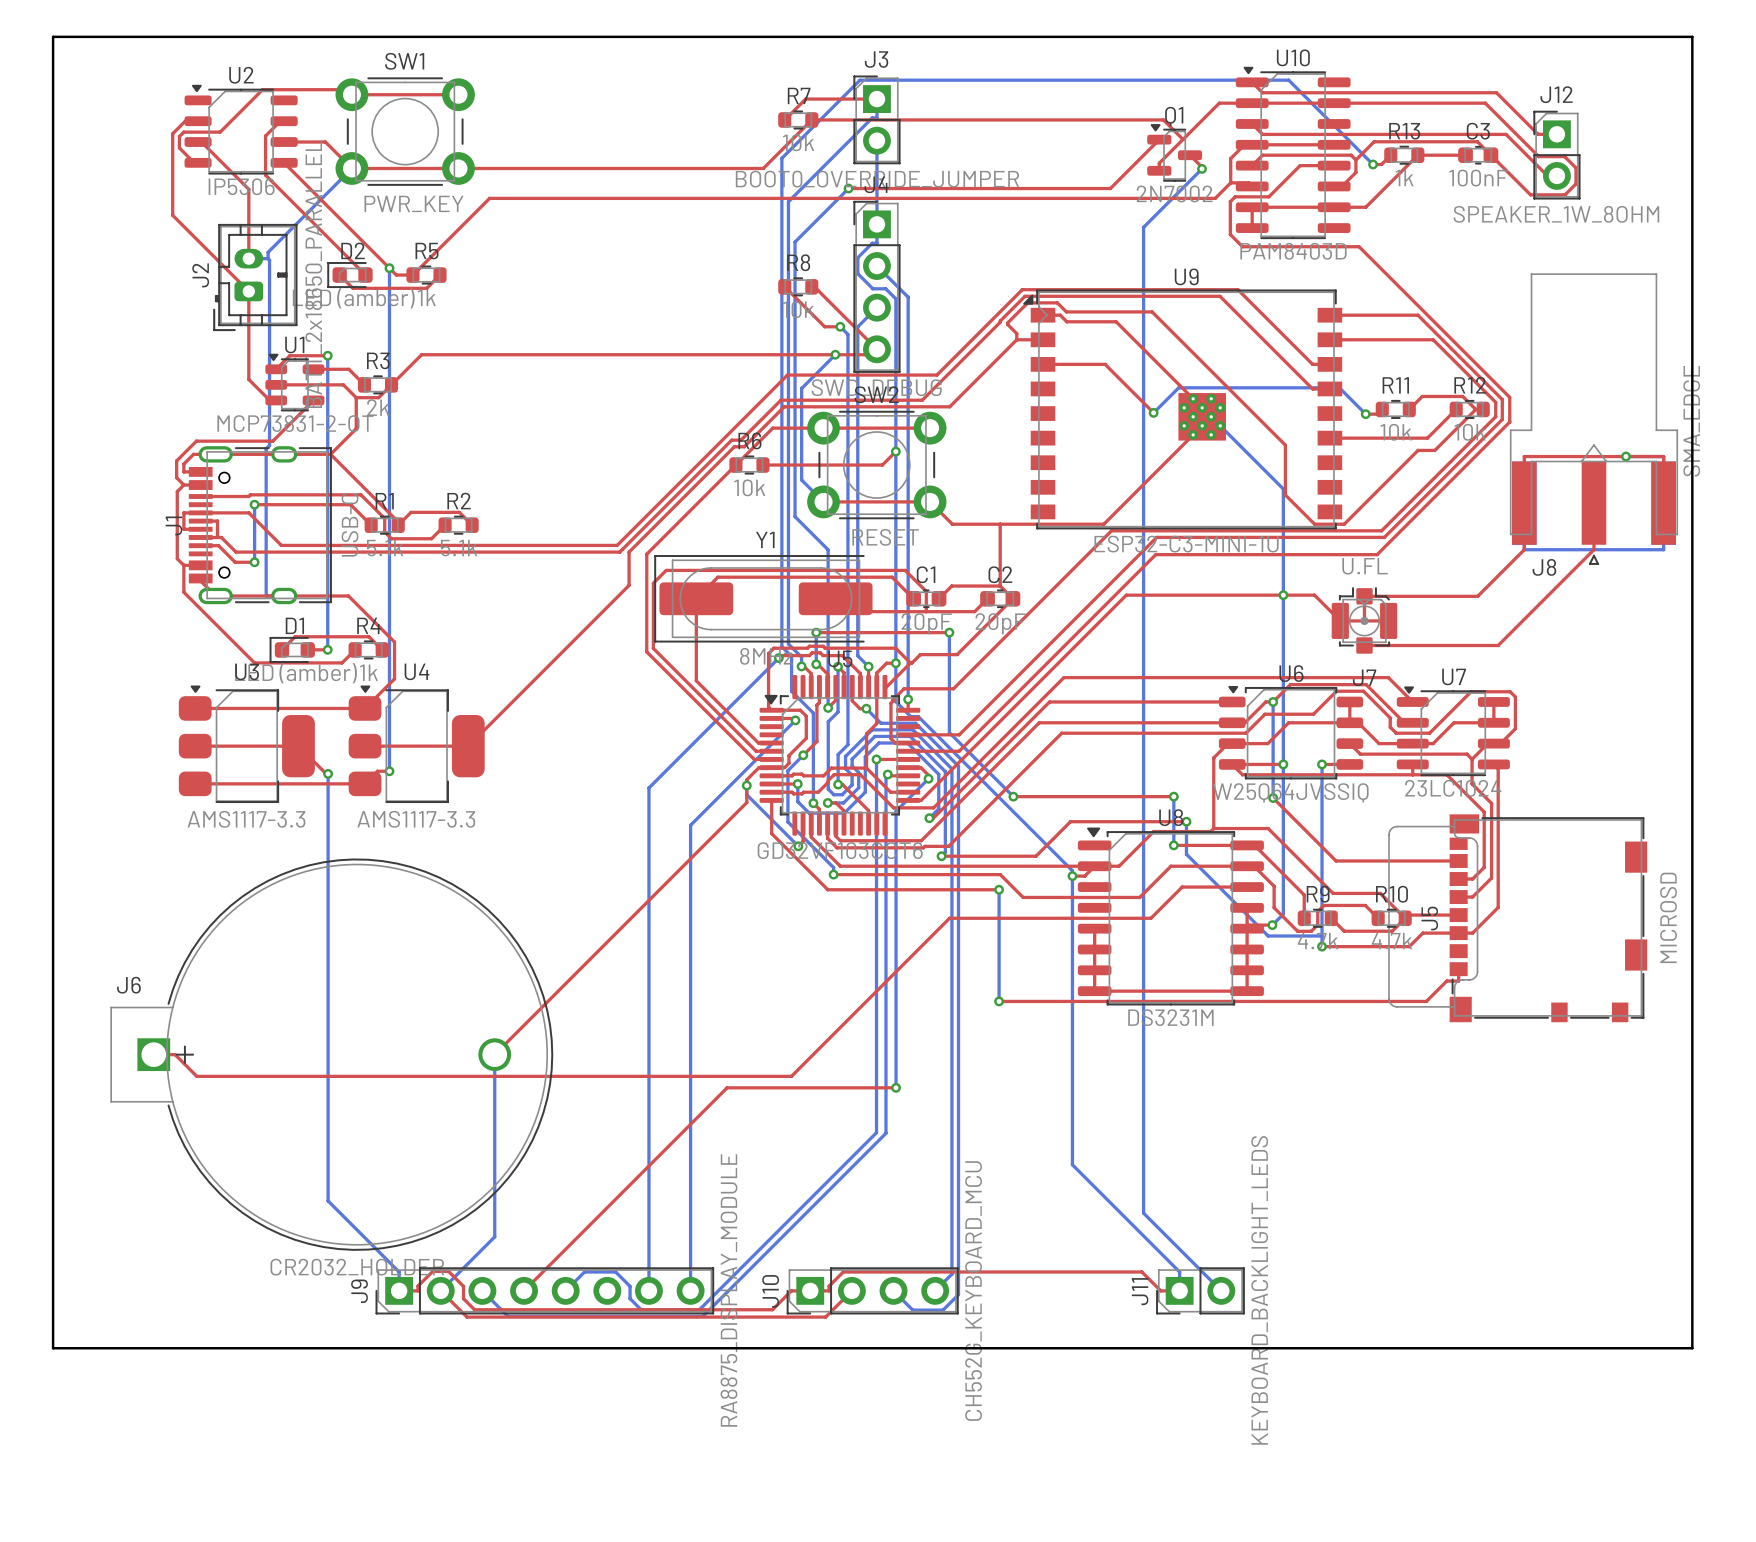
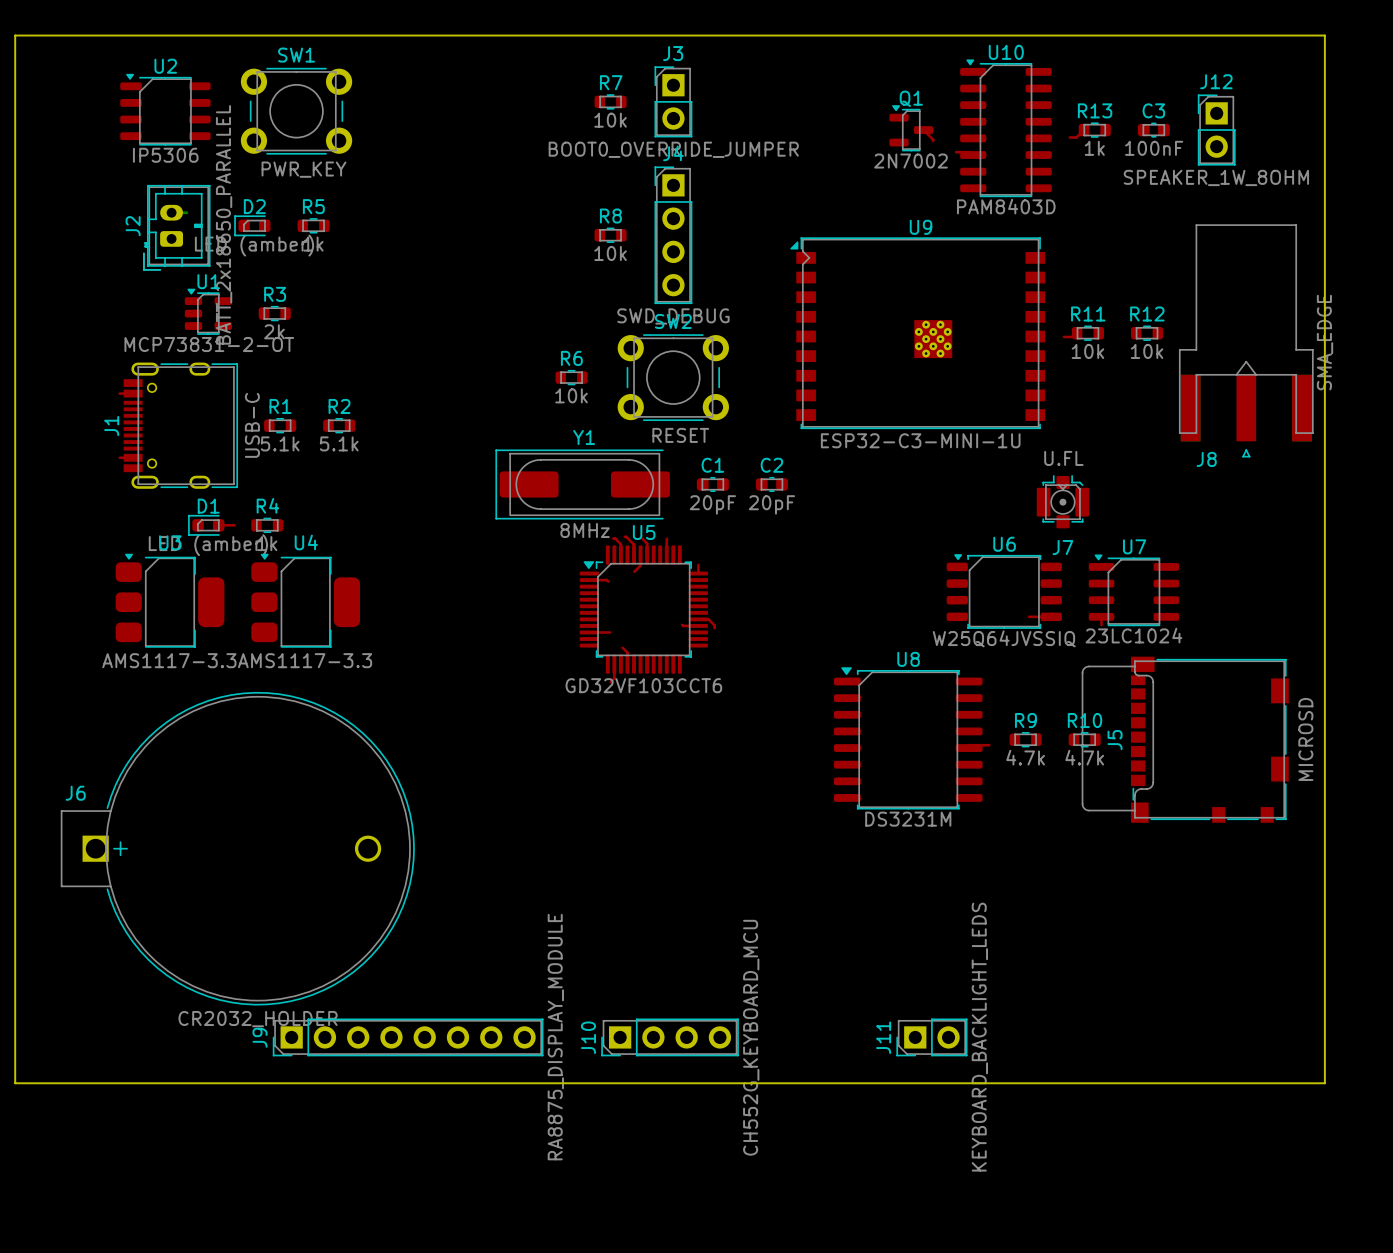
top track: (1252, 82) (1262, 92) (1496, 92) (1538, 134) (1556, 134) -> none
top track: (458, 94) (351, 94) (346, 89) (262, 89) (220, 132) (183, 132) (179, 136) (179, 148) (194, 162) (198, 162) -> none
top track: (876, 99) (805, 99) (784, 119) -> none
bottom track: (876, 99) (876, 117) (872, 117) (788, 201) (788, 644) (801, 657) (801, 666) -> none
top track: (198, 121) (185, 121) (172, 133) (172, 215) (248, 291) (248, 379) (269, 400) (276, 400) -> none
top track: (284, 121) (280, 121) (265, 136) (265, 175) (365, 275) -> none
top track: (1252, 123) (1262, 134) (1506, 134) (1547, 175) (1556, 175) -> none
top track: (1159, 139) (1110, 188) (848, 188) -> none
top track: (1183, 139) (1163, 119) (811, 119) (763, 168) (351, 168) (325, 142) (284, 142) -> none
bottom track: (876, 140) (876, 243) (872, 243) (857, 257) (857, 273) (872, 288) (885, 288) (895, 298) (895, 701) (910, 716) (918, 716) (1072, 870) (1072, 1164) (1179, 1271) (1179, 1290) -> none
top track: (198, 142) (201, 142) (248, 189) (248, 258) -> none
top track: (1334, 144) (1244, 144) (1230, 158) (1230, 182) (1215, 198) (489, 198) (412, 275) (396, 275) (284, 162) -> none
top track: (1465, 155) (1417, 155) (1365, 207) (1252, 207) (1252, 228) -> none
top track: (1355, 159) (1355, 172) (1341, 186) (1334, 186) -> none
top track: (1355, 159) (1374, 141) (1477, 141) (1530, 194) (1565, 194) (1576, 183) (1576, 167) (1564, 156) (1538, 156) (1485, 103) (1219, 103) (1159, 163) (1159, 170) -> none
top track: (1355, 159) (1351, 155) (1262, 155) (1252, 165) -> none
bottom track: (1373, 164) (1288, 80) (859, 80) (781, 158) (781, 646) (791, 656) (791, 691) (813, 713) (813, 803) -> none
via: (1373, 164) -> none
top track: (1334, 165) (1300, 165) (1268, 196) (1235, 196) (1230, 201) (1230, 234) (1242, 246) (1359, 246) (1509, 397) (1509, 422) (1377, 554) (1155, 554) (959, 751) (908, 751) -> none
bottom track: (351, 168) (268, 252) (269, 445) (266, 448) (266, 596) (284, 596) -> none
bottom track: (1202, 168) (1143, 227) (1143, 1213) (1221, 1290) -> none
via: (1202, 168) -> none
bottom track: (848, 188) (795, 242) (795, 516) (828, 549) (828, 707) -> none
via: (848, 188) -> none
bottom track: (876, 266) (908, 297) (908, 699) -> none
bottom track: (389, 268) (389, 771) -> none
via: (389, 268) -> none
top track: (339, 275) (352, 288) (426, 288) (440, 275) -> none
top track: (784, 286) (824, 326) (840, 326) -> none
top track: (811, 286) (814, 286) (876, 349) (871, 354) (421, 354) (378, 397) (356, 397) -> none
bottom track: (876, 307) (857, 326) (857, 655) (868, 666) -> none
top track: (1043, 315) (1060, 315) (1066, 321) (1116, 321) (1193, 398) (1211, 398) -> none
top track: (1329, 315) (1417, 315) (1502, 399) (1502, 419) (1384, 537) (1156, 537) (959, 734) (908, 734) -> none
bottom track: (840, 326) (847, 334) (847, 744) (838, 754) (838, 784) -> none
via: (840, 326) -> none
top track: (1016, 339) (949, 406) (784, 406) (744, 446) (734, 446) (629, 552) (629, 585) (468, 746) (365, 746) -> none
top track: (1016, 339) (1043, 339) -> none
top track: (1016, 339) (1016, 333) (1007, 323) (1027, 302) (1057, 302) (1066, 311) (1152, 311) (1285, 445) (1285, 495) (1314, 524) (1344, 524) (1418, 450) (1434, 450) (1475, 409) -> none
top track: (1329, 339) (1433, 339) (1495, 402) (1495, 416) (1381, 530) (1111, 530) (953, 688) (904, 688) (892, 699) (890, 703) (890, 738) (895, 743) (908, 743) -> none
bottom track: (835, 354) (801, 388) (801, 480) (823, 501) -> none
via: (835, 354) -> none
top track: (327, 355) (289, 355) (276, 369) -> none
bottom track: (327, 355) (327, 649) -> none
via: (327, 355) -> none
top track: (1043, 364) (1105, 364) (1153, 412) -> none
top track: (1329, 364) (1312, 364) (1237, 289) (1022, 289) (936, 375) (787, 375) (617, 545) (281, 545) (248, 512) (183, 512) (183, 529) (200, 529) -> none
top track: (313, 369) (348, 369) (364, 384) -> none
top track: (276, 384) (343, 384) (356, 397) -> none
top track: (1329, 388) (1312, 388) (1219, 296) (1025, 296) (922, 400) (780, 400) (740, 440) (731, 440) (619, 552) (236, 552) (221, 537) (200, 537) -> none
top track: (356, 397) (356, 428) (330, 454) -> none
top track: (313, 400) (272, 441) (196, 441) (176, 460) (176, 477) (183, 485) (177, 491) (177, 558) (183, 565) (183, 592) (254, 662) (342, 662) (355, 649) -> none
top track: (1409, 409) (1422, 396) (1462, 396) (1475, 409) -> none
top track: (1456, 409) (1427, 438) (1329, 438) -> none
bottom track: (1153, 412) (1178, 387) (1339, 387) (1365, 414) -> none
via: (1153, 412) -> none
via: (1365, 414) -> none
bottom track: (1220, 425) (1283, 488) (1283, 914) (1272, 925) -> none
top track: (930, 428) (772, 428) (646, 554) (646, 651) (754, 759) (771, 759) -> none
top track: (1211, 434) (1193, 434) (1103, 524) (952, 524) (930, 501) (823, 501) -> none
top track: (895, 451) (882, 465) (762, 465) -> none
via: (895, 451) -> none
top track: (330, 454) (399, 523) -> none
top track: (330, 454) (193, 454) (183, 464) (183, 471) (200, 471) -> none
bottom track: (1625, 456) (1663, 456) (1663, 549) (1524, 549) (1524, 503) -> none
via: (1625, 456) -> none
top track: (200, 496) (360, 494) (384, 518) (384, 531) (391, 538) (431, 538) (445, 525) -> none
top track: (1593, 503) (1593, 549) (1498, 645) (1364, 645) -> none
top track: (1663, 503) (1663, 456) (1524, 456) (1524, 549) (1477, 596) (1364, 596) (1364, 620) -> none
top track: (254, 504) (350, 504) (371, 525) -> none
bottom track: (254, 504) (254, 562) -> none
via: (254, 504) -> none
top track: (200, 521) (217, 521) (217, 537) -> none
top track: (1000, 524) (1000, 586) -> none
top track: (398, 525) (411, 512) (459, 512) (472, 525) -> none
top track: (200, 545) (218, 545) (235, 562) (254, 562) -> none
via: (254, 562) -> none
top track: (200, 578) (200, 581) (215, 596) (348, 596) (394, 642) (394, 678) (365, 708) (195, 708) -> none
top track: (1000, 586) (1012, 598) (957, 654) (920, 654) (910, 663) -> none
top track: (1000, 586) (951, 586) (939, 598) -> none
via: (1283, 595) -> none
top track: (835, 598) (848, 611) (974, 611) (987, 598) -> none
top track: (913, 598) (892, 577) (717, 577) (696, 598) (696, 680) (758, 743) (771, 743) -> none
top track: (926, 611) (926, 591) (905, 570) (666, 570) (653, 583) (653, 648) (756, 751) (771, 751) -> none
top track: (1388, 620) (1340, 620) (1314, 595) (1126, 595) (921, 800) (908, 800) -> none
top track: (816, 632) (949, 632) -> none
bottom track: (816, 632) (816, 664) -> none
via: (816, 632) -> none
bottom track: (949, 632) (949, 732) (1013, 796) -> none
via: (949, 632) -> none
top track: (281, 649) (295, 636) (368, 636) (382, 649) -> none
via: (327, 649) -> none
top track: (778, 658) (781, 655) (809, 655) (812, 652) (820, 652) (823, 655) (842, 655) (860, 673) (860, 687) -> none
bottom track: (778, 658) (648, 787) (648, 1290) -> none
via: (778, 658) -> none
top track: (895, 663) (886, 663) (876, 673) (876, 723) (866, 733) (866, 768) -> none
via: (895, 663) -> none
top track: (910, 663) (895, 648) (824, 648) (823, 646) (773, 648) (768, 653) (768, 707) (771, 710) (800, 710) (806, 716) (806, 738) (788, 755) (788, 763) (784, 767) (759, 767) (746, 779) (746, 802) (494, 1054) -> none
top track: (910, 663) (885, 687) -> none
via: (816, 664) -> none
via: (801, 666) -> none
bottom track: (838, 666) (838, 712) (828, 721) (828, 789) (833, 794) (842, 794) (852, 784) (852, 775) (845, 768) (845, 756) (872, 729) (912, 729) (951, 768) (951, 1274) (935, 1290) -> none
via: (838, 666) -> none
via: (868, 666) -> none
top track: (819, 687) (819, 702) (816, 705) (816, 741) (803, 755) -> none
top track: (852, 687) (852, 700) (860, 708) (866, 708) -> none
via: (908, 699) -> none
top track: (1232, 701) (1049, 701) (933, 818) (929, 818) -> none
bottom track: (1273, 701) (1273, 798) -> none
via: (1273, 701) -> none
top track: (1349, 701) (1349, 722) -> none
top track: (1412, 701) (1388, 677) (1063, 677) (933, 807) (893, 807) (860, 774) (834, 774) (818, 792) (801, 793) (771, 792) -> none
top track: (1493, 701) (1493, 722) (1453, 722) (1433, 743) (1379, 743) (1358, 722) (1288, 722) (1267, 743) (1228, 743) (1213, 757) (1213, 828) -> none
via: (828, 707) -> none
bottom track: (866, 708) (880, 723) (915, 723) (958, 766) (958, 1294) (943, 1310) (912, 1310) (893, 1290) -> none
via: (866, 708) -> none
bottom track: (795, 720) (690, 825) (690, 1290) -> none
via: (795, 720) -> none
top track: (1232, 722) (1244, 722) (1265, 701) (1273, 701) (1290, 684) (1366, 684) (1404, 722) (1412, 722) -> none
top track: (1232, 722) (1039, 722) (921, 840) (840, 840) (835, 836) (835, 823) -> none
top track: (1349, 743) (1360, 754) (1466, 754) (1472, 759) -> none
top track: (195, 746) (298, 746) (328, 773) -> none
bottom track: (803, 755) (787, 770) (787, 821) (833, 867) (833, 874) -> none
via: (803, 755) -> none
top track: (876, 759) (908, 759) -> none
bottom track: (876, 759) (876, 1132) (699, 1309) (641, 1309) (630, 1298) (630, 1286) (615, 1271) (584, 1271) (565, 1290) -> none
via: (876, 759) -> none
top track: (1472, 759) (1472, 783) (1491, 803) (1491, 878) (1472, 897) (1458, 897) -> none
top track: (1472, 759) (1487, 743) (1500, 743) (1515, 728) (1515, 696) (1510, 691) (1471, 691) (1429, 733) (1396, 733) (1390, 727) (1390, 717) (1363, 691) (1336, 691) (1313, 714) (1264, 714) (1246, 733) (1061, 733) (948, 846) (837, 847) (827, 838) (827, 823) -> none
top track: (1283, 764) (1232, 764) (1242, 774) (1446, 774) (1484, 812) (1484, 867) (1472, 879) (1458, 879) -> none
via: (1283, 764) -> none
bottom track: (1322, 764) (1322, 946) -> none
via: (1322, 764) -> none
top track: (1493, 764) (1498, 768) (1498, 907) (1472, 933) (1422, 933) (1409, 946) (1322, 946) -> none
top track: (866, 768) (831, 768) (823, 775) (803, 775) (801, 774) (771, 775) -> none
top track: (866, 768) (890, 792) (908, 792) -> none
top track: (389, 771) (377, 771) (365, 783) (195, 783) -> none
via: (389, 771) -> none
bottom track: (328, 773) (328, 1200) (399, 1271) (399, 1290) -> none
via: (328, 773) -> none
bottom track: (887, 774) (886, 776) (886, 1133) (702, 1316) (507, 1316) (482, 1290) -> none
via: (887, 774) -> none
bottom track: (928, 778) (896, 811) (896, 1087) -> none
via: (928, 778) -> none
bottom track: (797, 784) (797, 801) (809, 813) (844, 813) (865, 792) (865, 756) (878, 743) (907, 743) (938, 774) (938, 808) (929, 818) -> none
via: (797, 784) -> none
top track: (838, 784) (842, 784) (868, 810) (868, 823) -> none
via: (838, 784) -> none
bottom track: (746, 785) (746, 794) (798, 846) -> none
via: (746, 785) -> none
top track: (1013, 796) (1173, 796) -> none
via: (1013, 796) -> none
bottom track: (1173, 796) (1173, 845) -> none
via: (1173, 796) -> none
top track: (1273, 798) (1336, 860) (1458, 860) -> none
via: (1273, 798) -> none
top track: (771, 800) (771, 833) (827, 889) (999, 889) -> none
top track: (827, 802) (836, 802) (844, 810) (844, 823) -> none
bottom track: (827, 802) (843, 802) (858, 787) (858, 772) (852, 765) (852, 759) (874, 736) (910, 736) (945, 771) (945, 852) (941, 856) -> none
via: (827, 802) -> none
via: (813, 803) -> none
via: (929, 818) -> none
top track: (1186, 821) (1070, 821) (1035, 856) (941, 856) -> none
bottom track: (1186, 821) (1186, 854) (1268, 936) (1322, 936) -> none
via: (1186, 821) -> none
top track: (811, 823) (811, 837) (840, 866) (1119, 866) (1153, 831) (1210, 831) (1213, 828) -> none
top track: (1213, 828) (1268, 828) (1333, 893) (1380, 893) (1405, 918) -> none
top track: (1173, 845) (1254, 845) (1304, 894) (1304, 918) -> none
via: (1173, 845) -> none
via: (798, 846) -> none
via: (941, 856) -> none
top track: (1094, 866) (1084, 876) (1072, 876) -> none
top track: (833, 874) (1000, 874) (1023, 897) (1139, 897) (1170, 866) (1254, 866) (1274, 886) (1274, 907) (1297, 931) (1311, 931) (1317, 924) (1317, 911) (1323, 905) (1365, 905) (1378, 918) -> none
via: (833, 874) -> none
via: (1072, 876) -> none
top track: (1247, 887) (1182, 887) (1151, 918) (949, 918) (791, 1076) (196, 1076) (175, 1054) (153, 1054) -> none
bottom track: (999, 889) (999, 1001) -> none
via: (999, 889) -> none
top track: (1247, 907) (1247, 991) (1094, 991) (1094, 928) -> none
top track: (1458, 915) (1408, 915) (1392, 931) (1344, 931) (1331, 918) -> none
via: (1272, 925) -> none
via: (1322, 946) -> none
top track: (1458, 969) (1458, 981) (1446, 981) (1426, 1001) (999, 1001) -> none
via: (999, 1001) -> none
bottom track: (494, 1054) (494, 1236) (440, 1290) -> none
top track: (896, 1087) (727, 1087) (524, 1290) -> none
via: (896, 1087) -> none
top track: (399, 1290) (418, 1290) (418, 1286) (432, 1271) (448, 1271) (463, 1286) (463, 1298) (474, 1309) (772, 1309) (791, 1290) (829, 1290) (829, 1286) (843, 1271) (1141, 1271) (1160, 1290) (1179, 1290) -> none
top track: (440, 1290) (466, 1317) (825, 1317) (851, 1290) -> none

